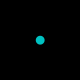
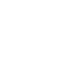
part: (40, 40) -> none

